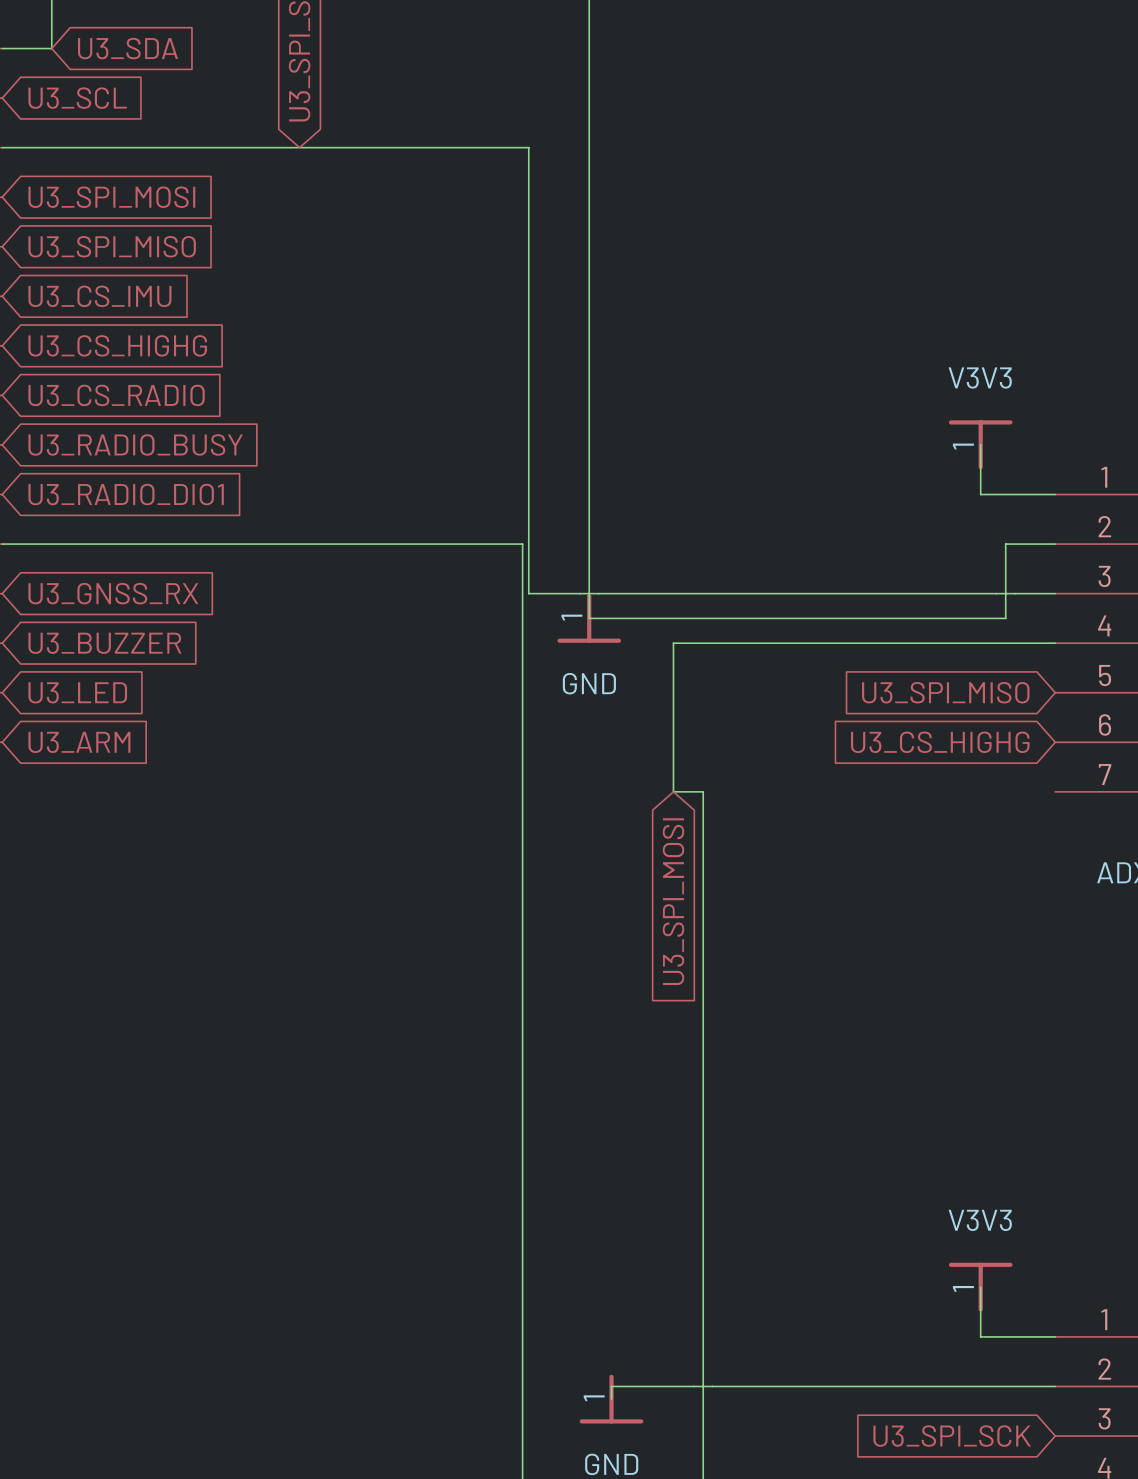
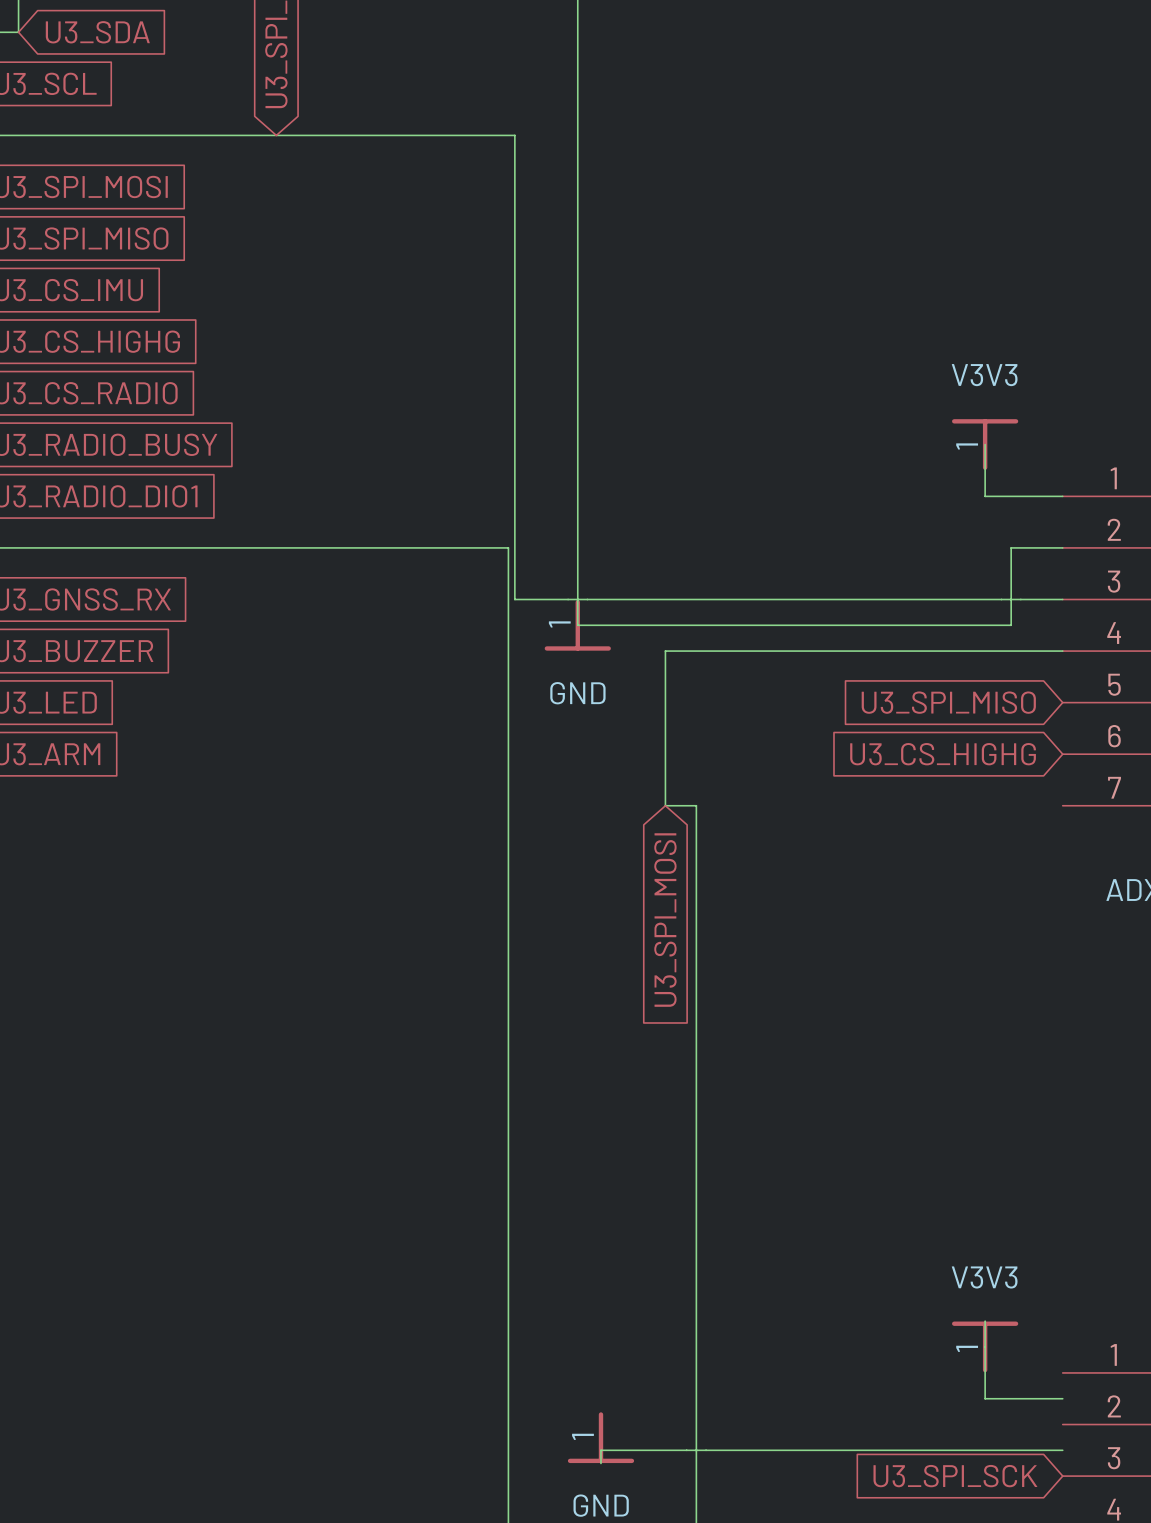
V3V3 position: (980, 1287) -> (985, 1346)
wire: (980, 1336) (1055, 1336) -> (985, 1372) (985, 1398) (1062, 1398)
wire: (1055, 1386) (611, 1386) (611, 1399) -> (1062, 1450) (600, 1450) (600, 1463)

